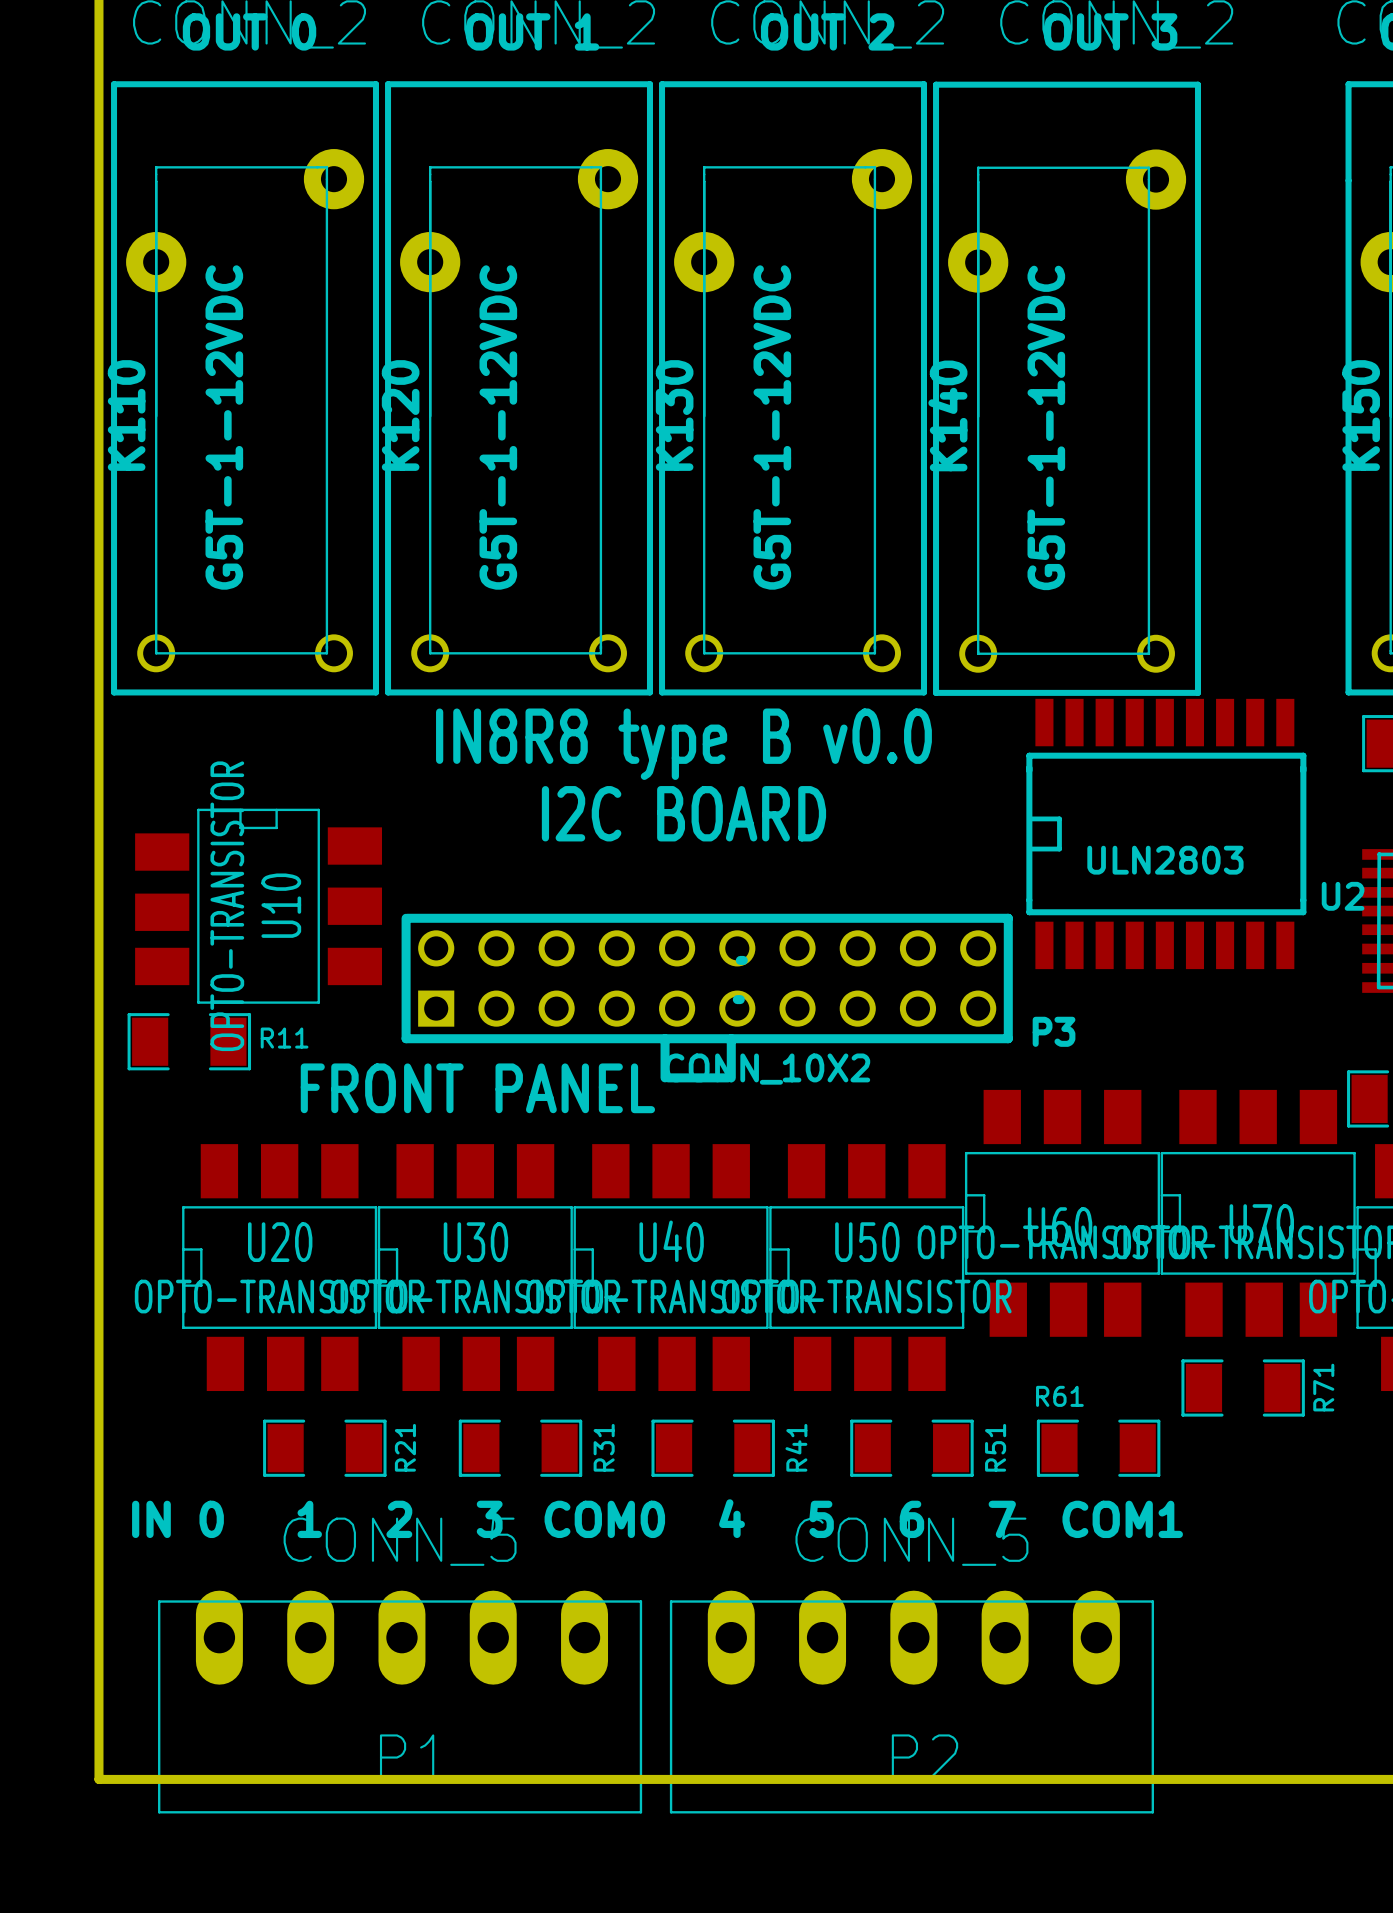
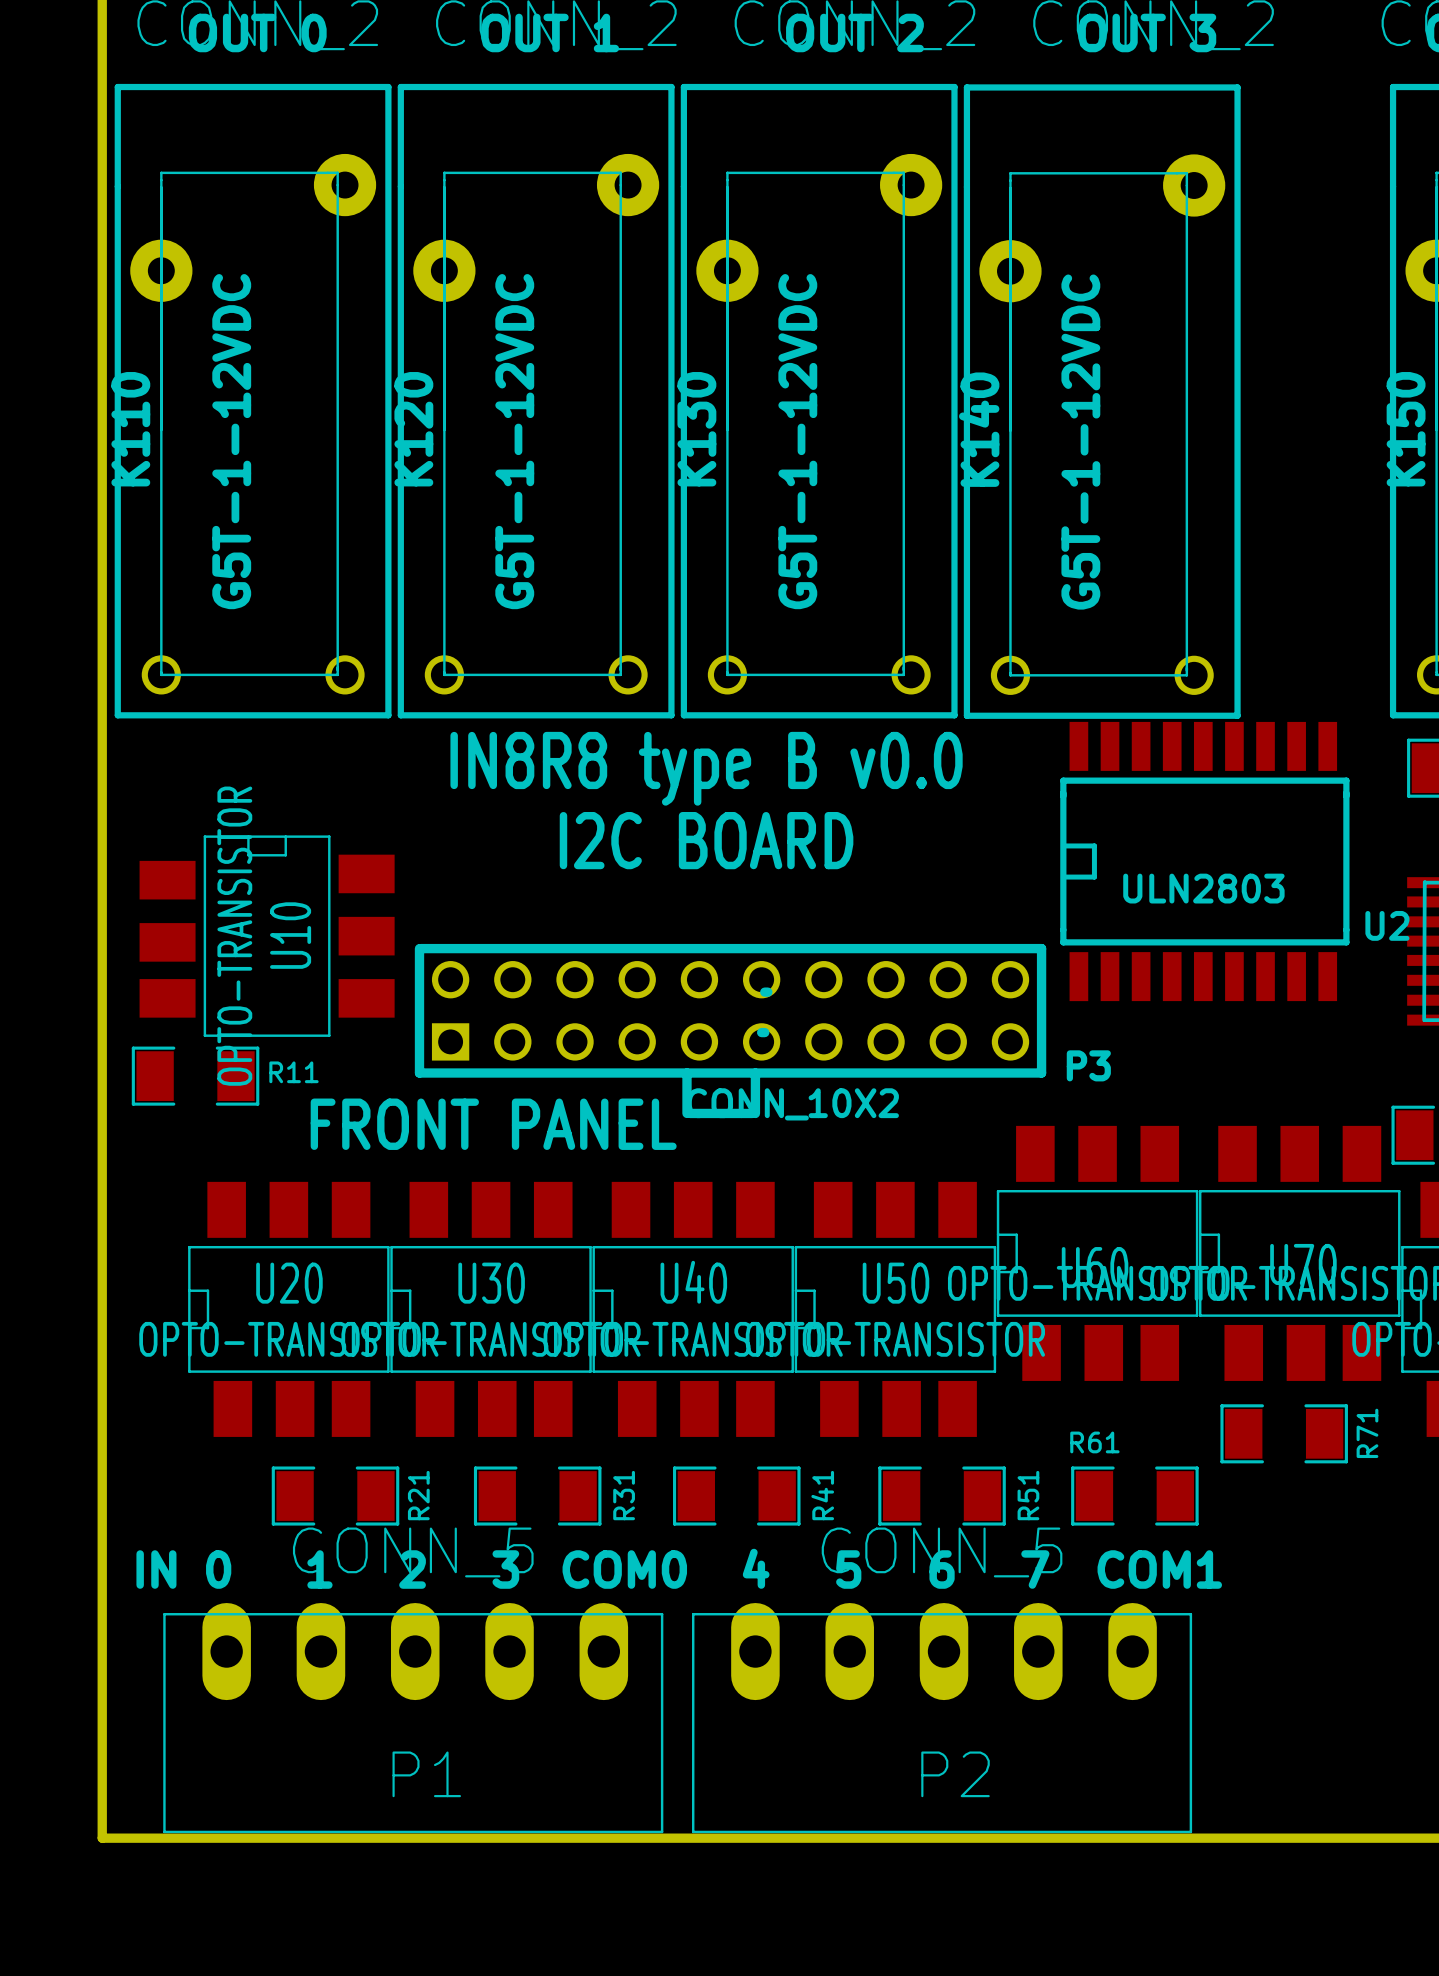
P1 position: (400, 1702) -> (413, 1718)
P2 position: (911, 1702) -> (942, 1718)

